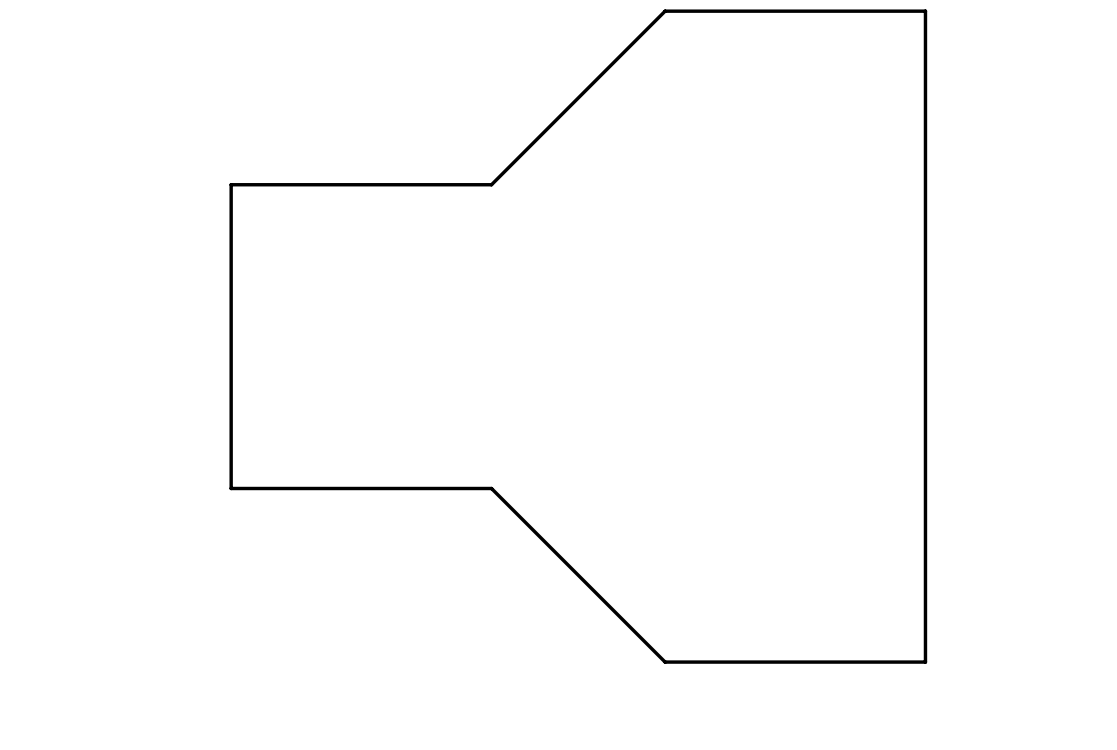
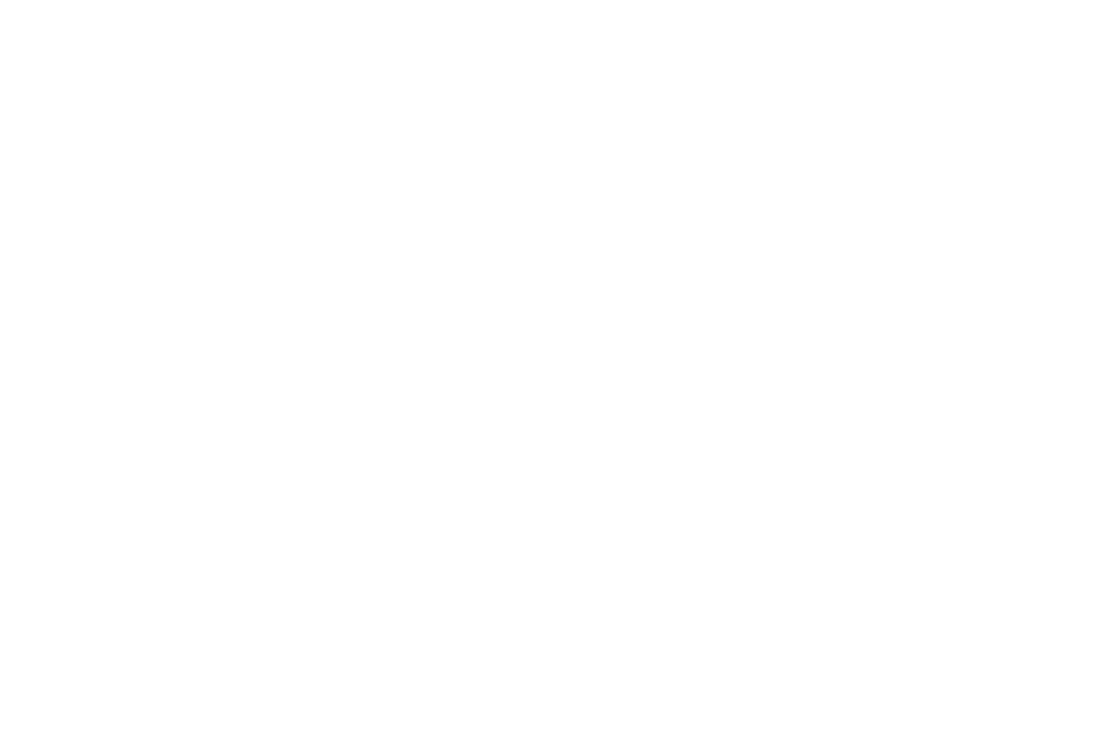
board edge: (925, 11) (925, 662) (665, 662) (491, 488) (231, 488) (231, 184) (491, 184) (665, 11) (925, 11) -> none

